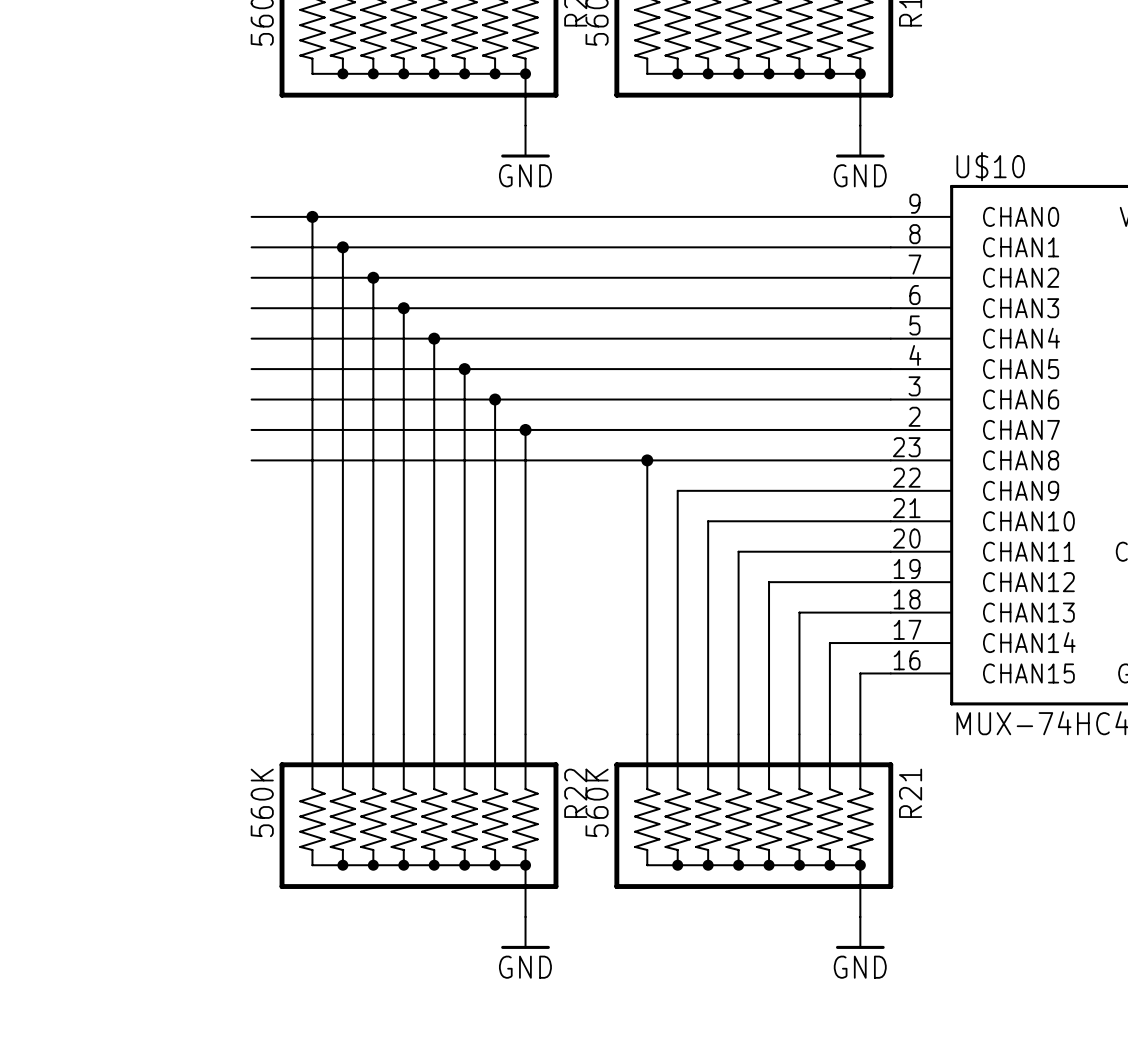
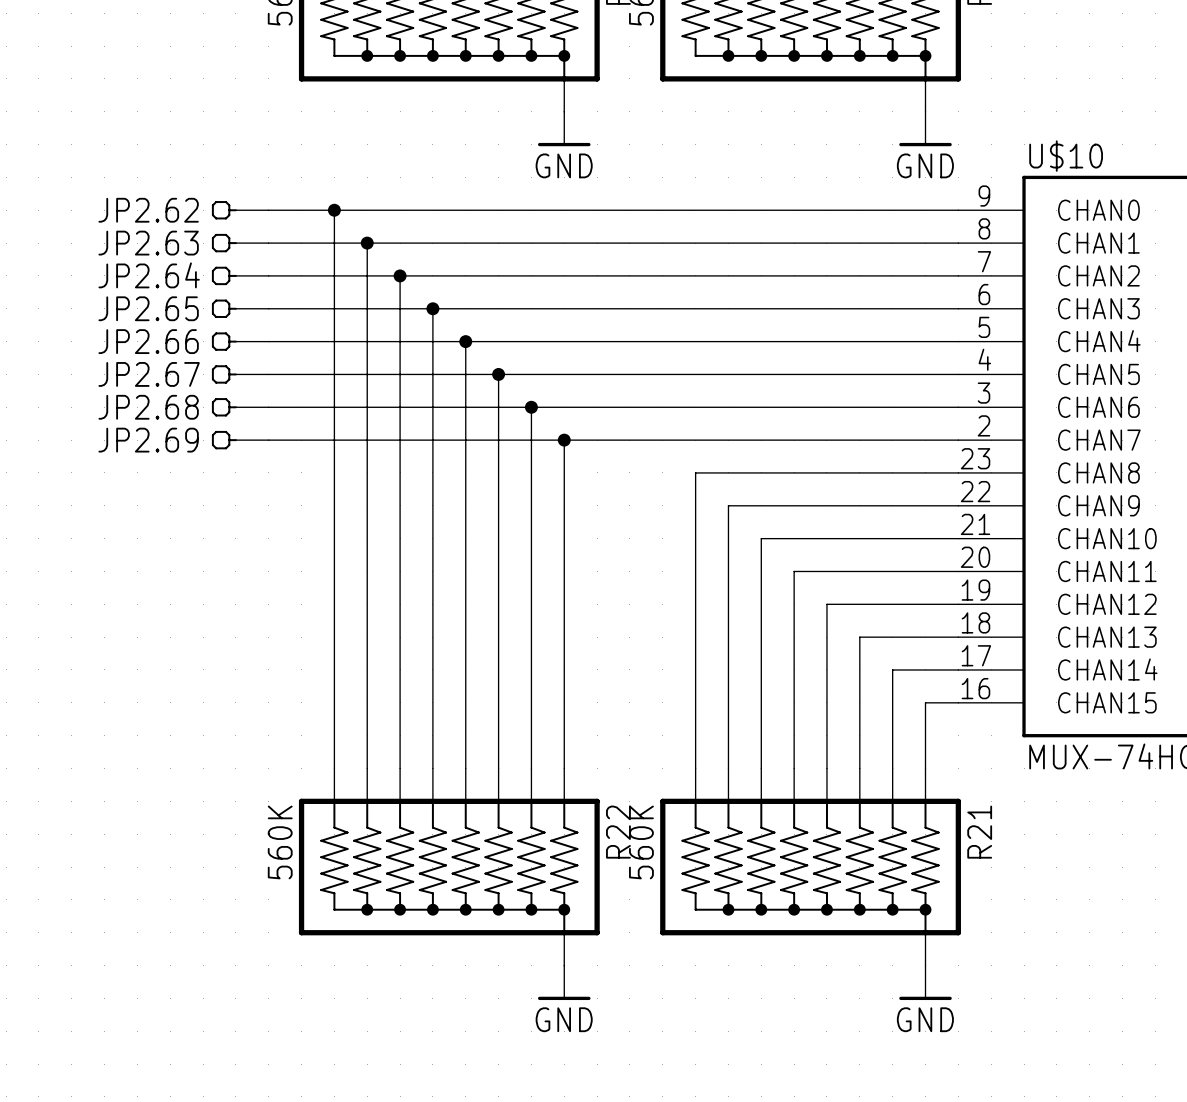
JP2.62: none -> (240, 210)
JP2.63: none -> (240, 243)
JP2.64: none -> (240, 275)
JP2.65: none -> (240, 308)
JP2.66: none -> (240, 341)
JP2.67: none -> (240, 374)
JP2.68: none -> (240, 407)
JP2.69: none -> (240, 440)
wire: (251, 460) (647, 460) -> none
junction: (647, 460) -> none

